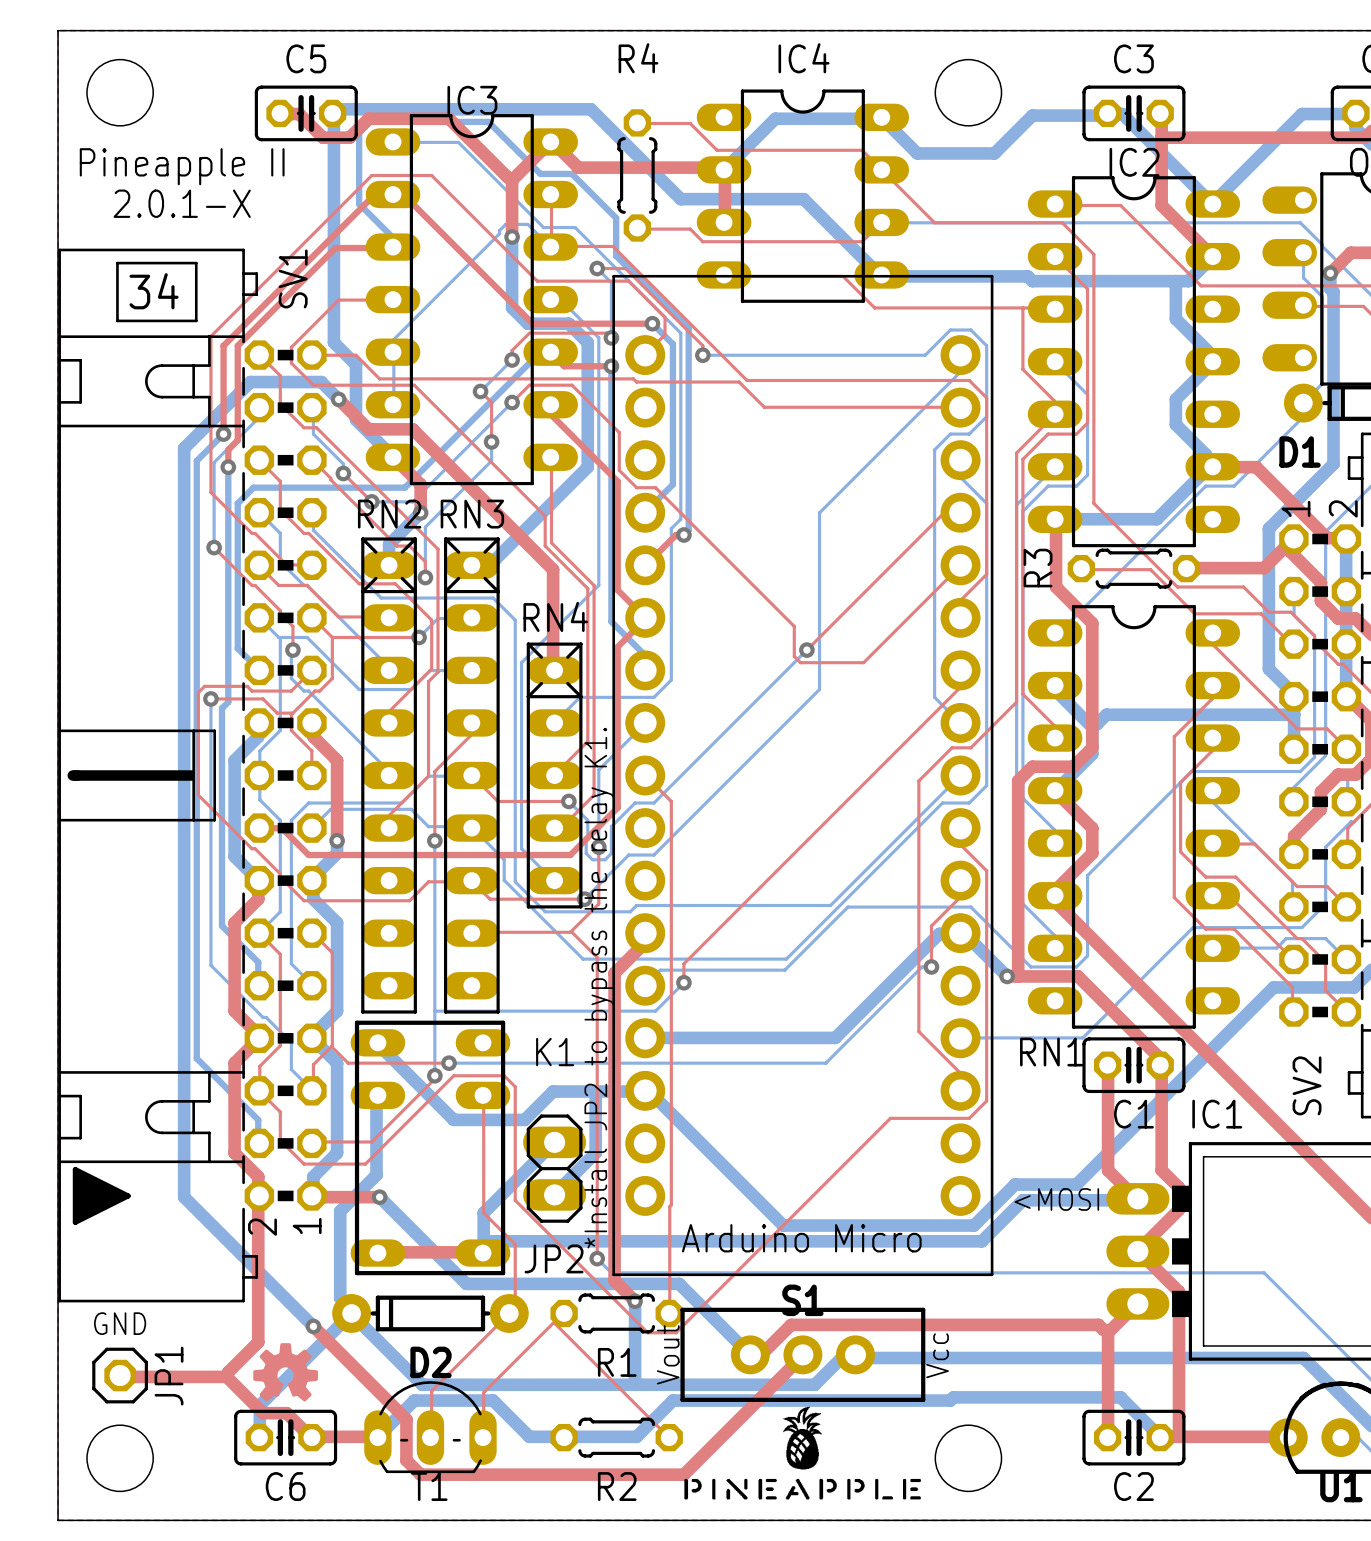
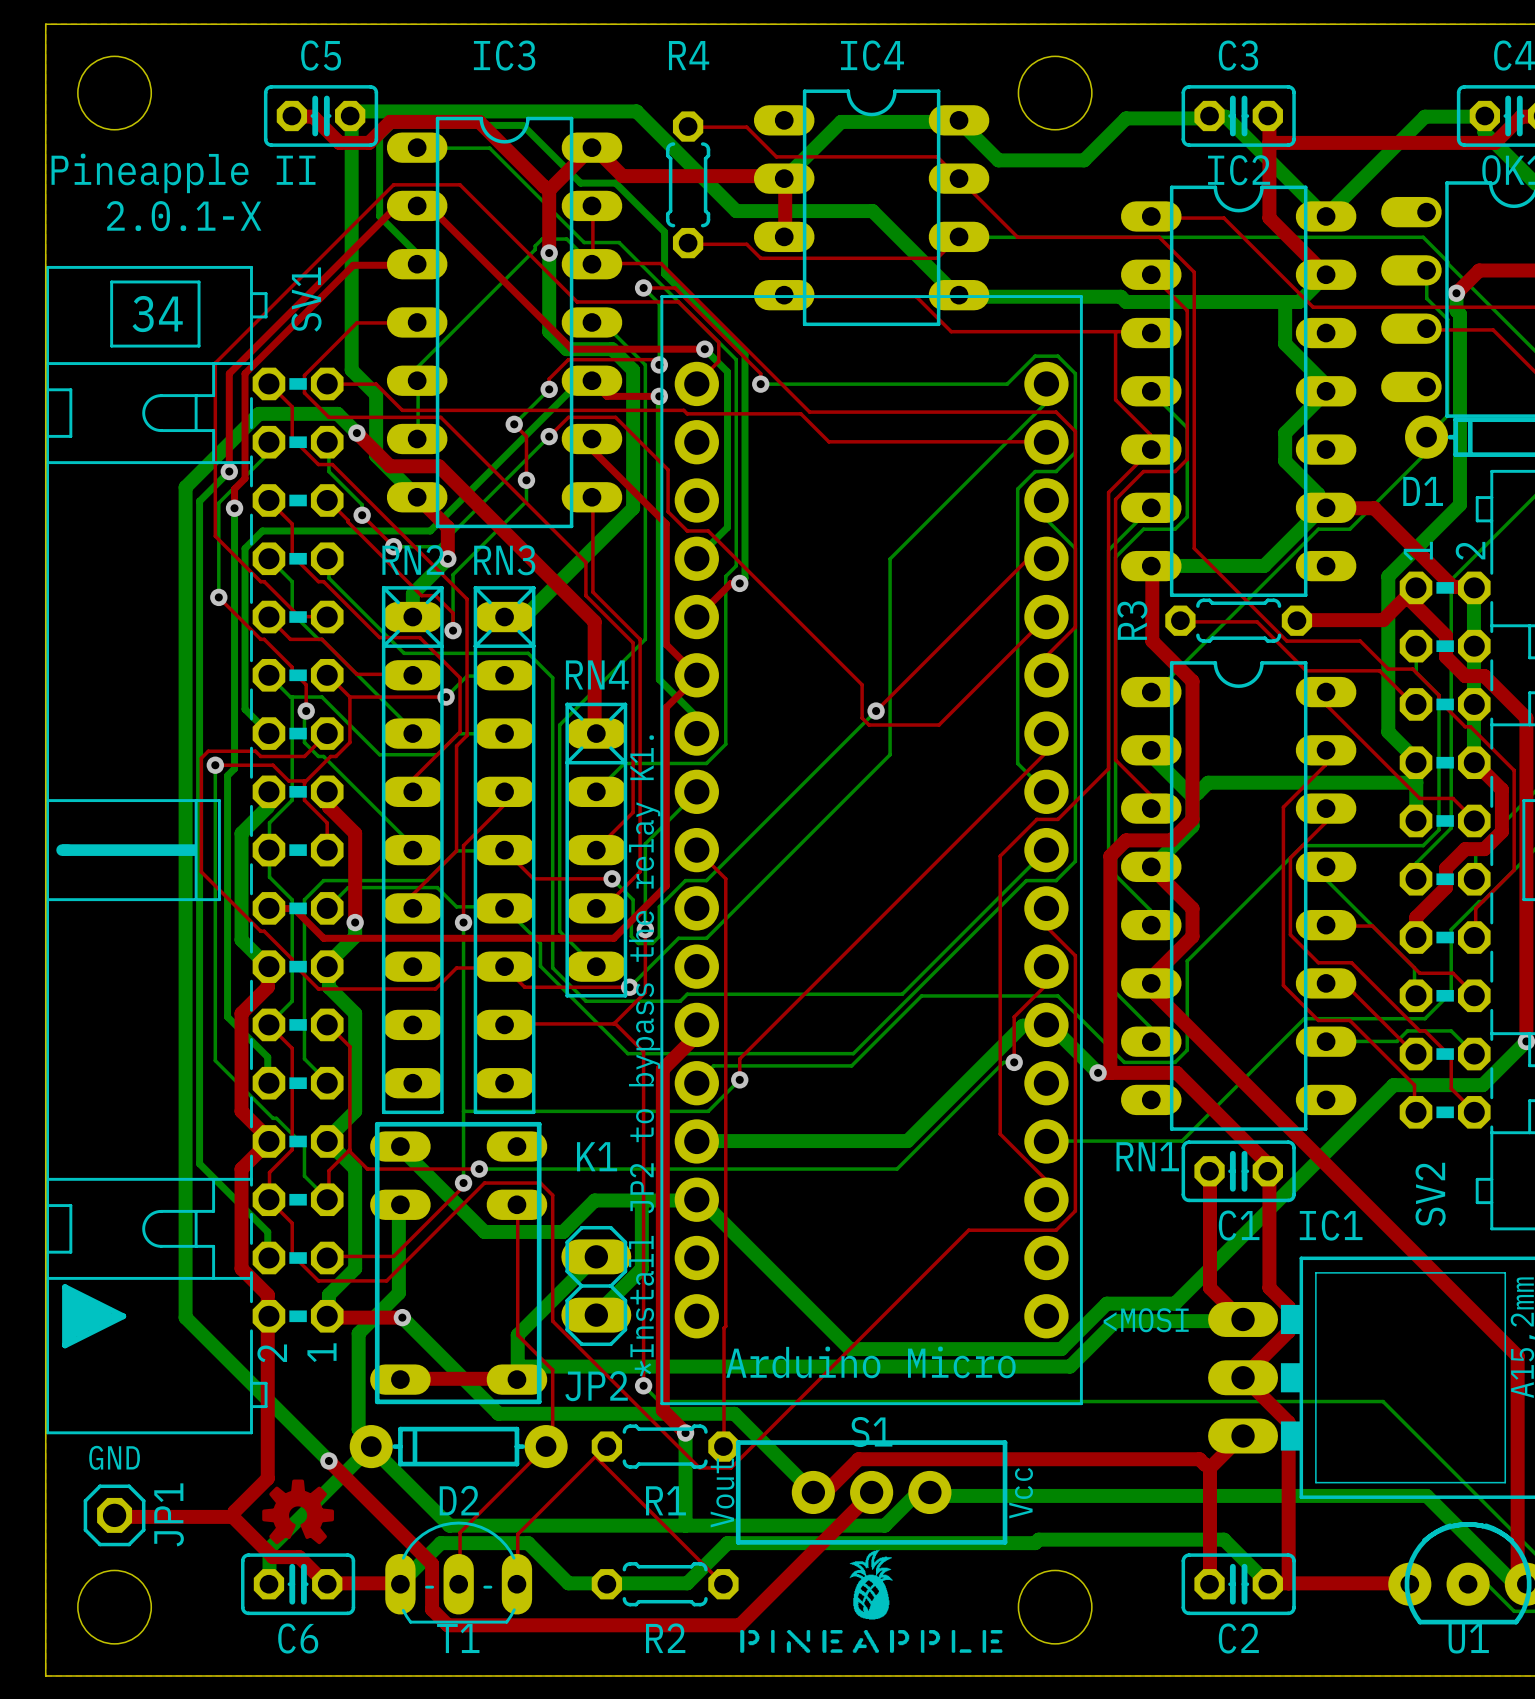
IC3 name position: IC3 (472, 100) -> IC3 (504, 55)

